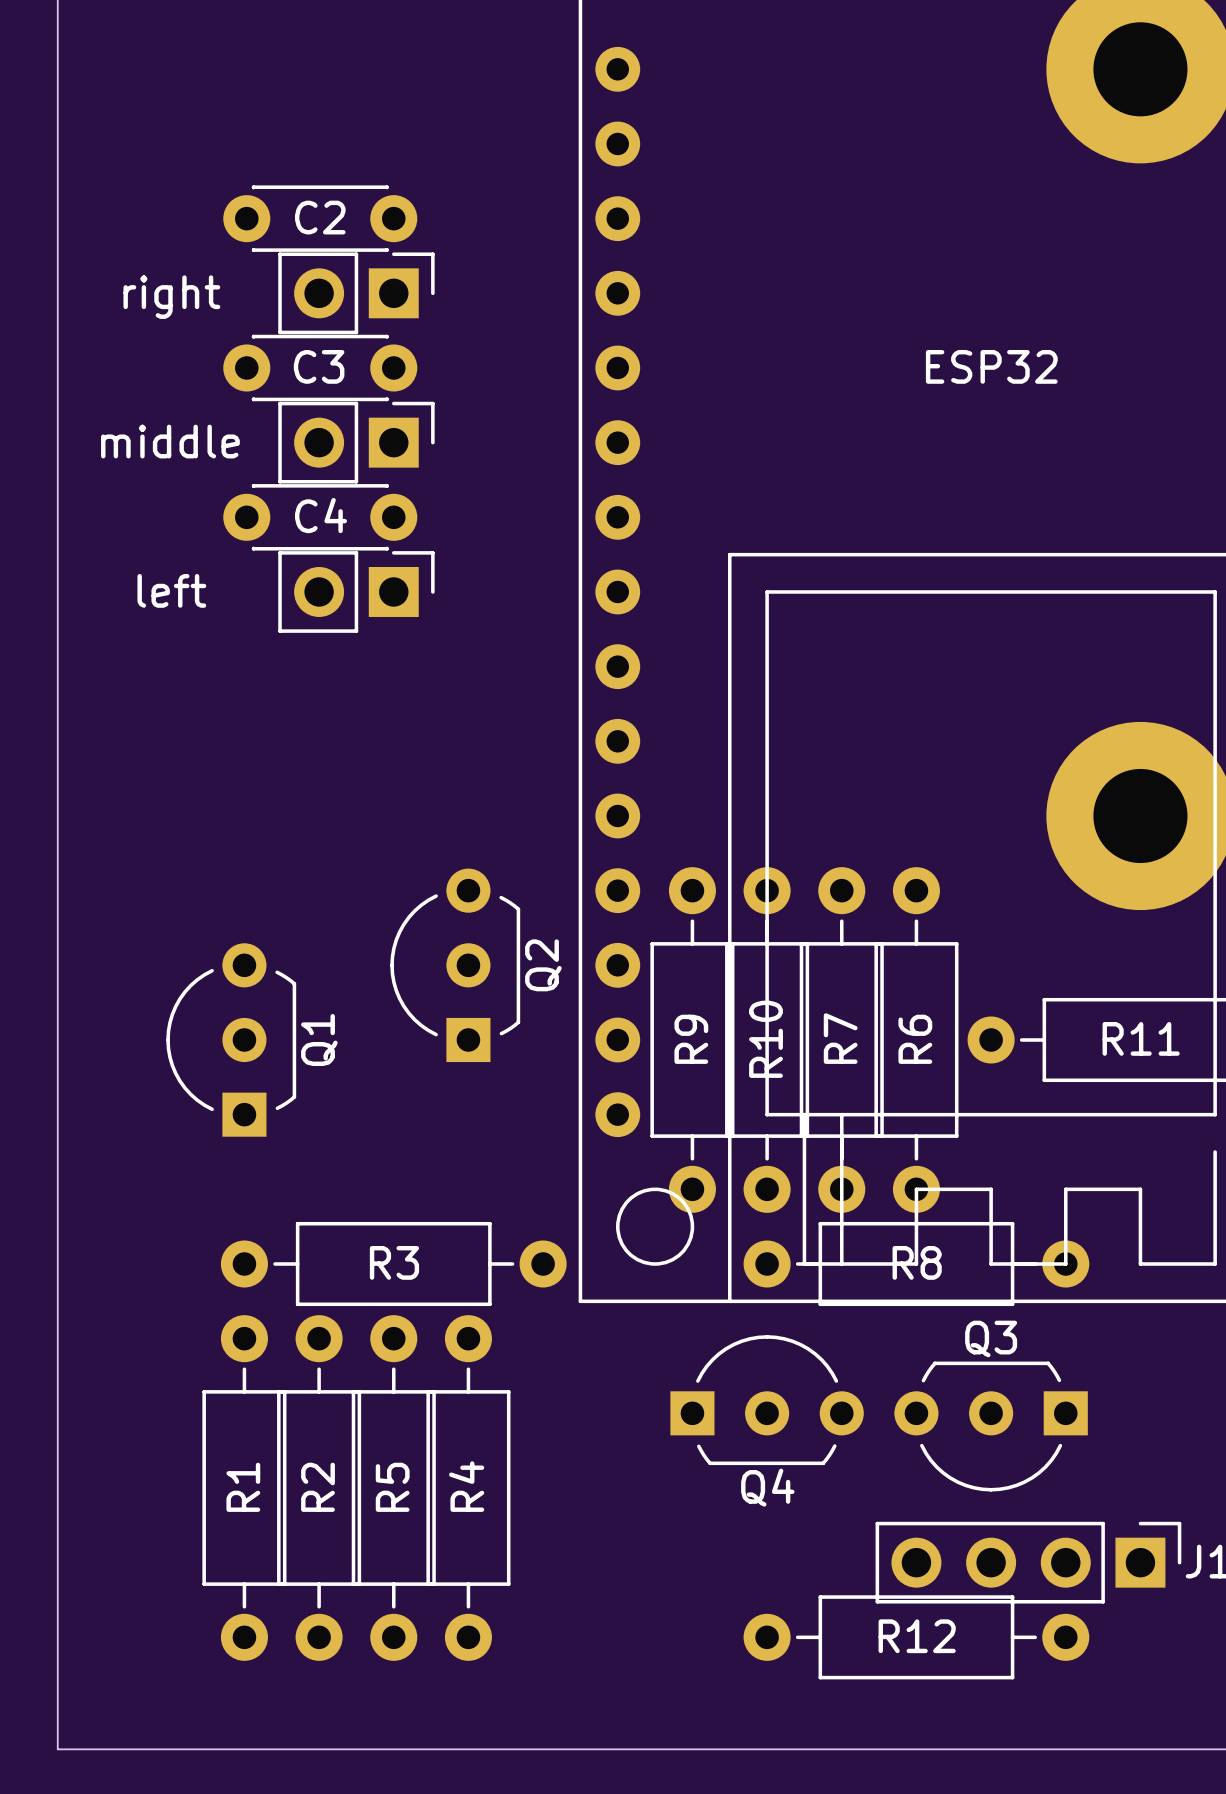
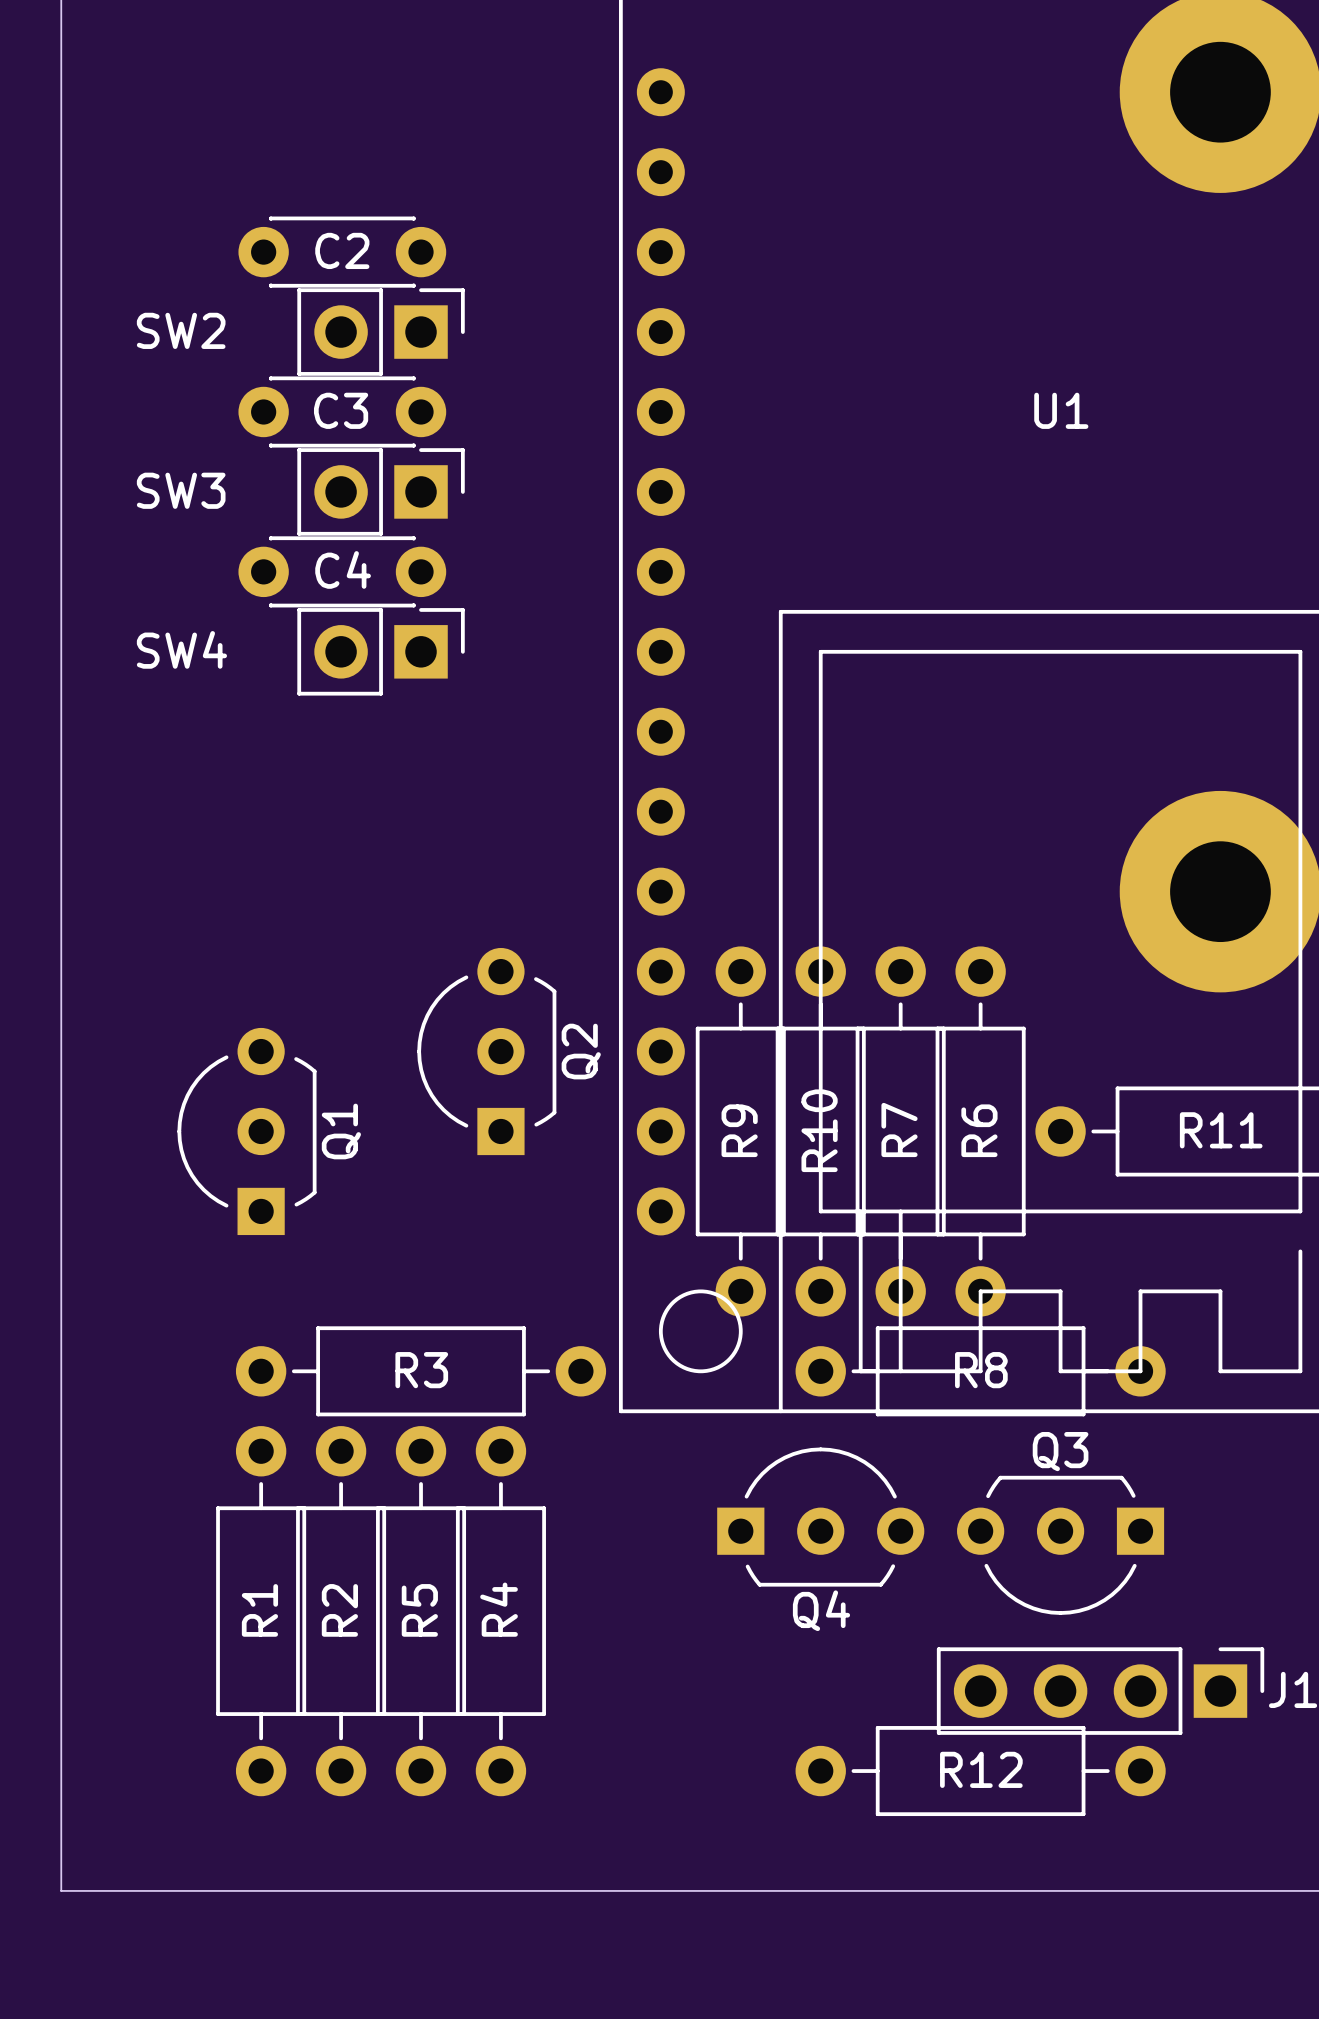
right name: right (171, 297) -> SW2 (181, 330)
ESP32 name: ESP32 (991, 366) -> U1 (1061, 410)
middle name: middle (170, 441) -> SW3 (181, 490)
left name: left (171, 590) -> SW4 (181, 649)

